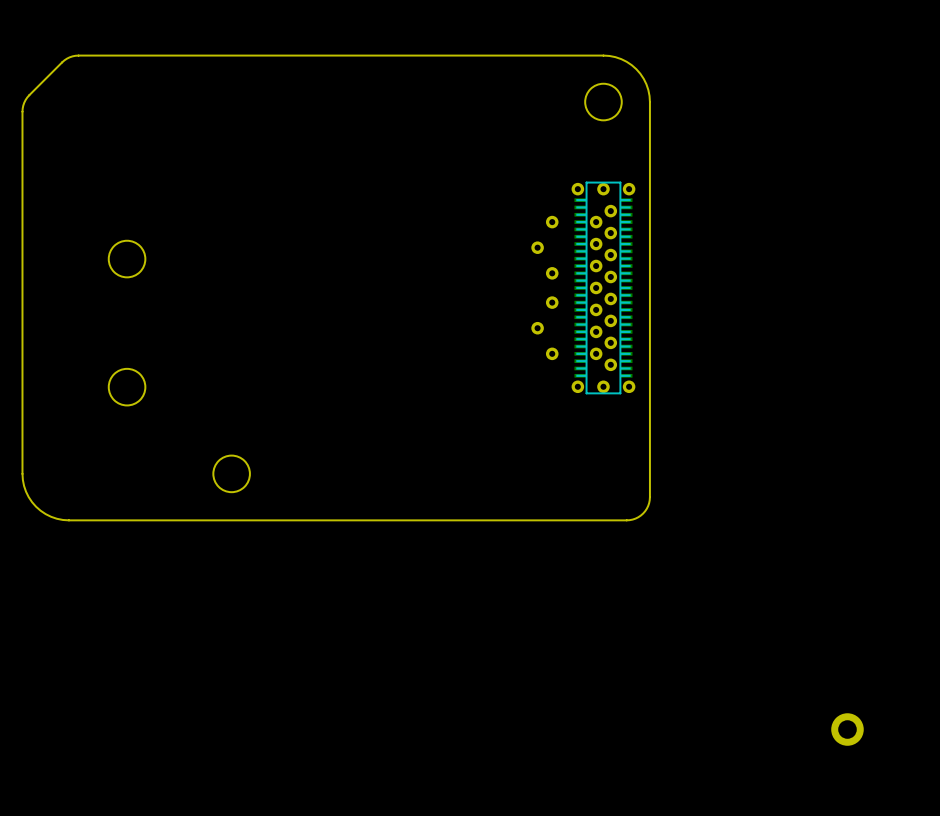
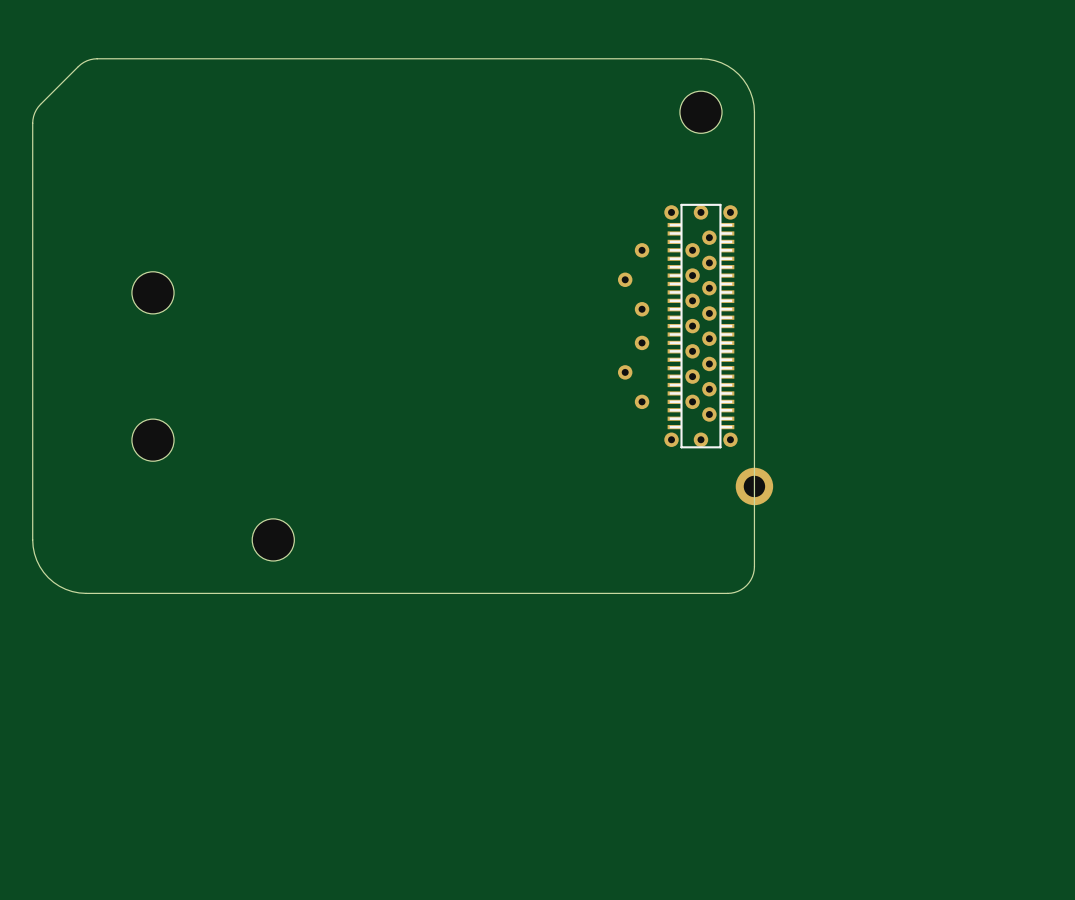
part position: (847, 729) -> (754, 486)

